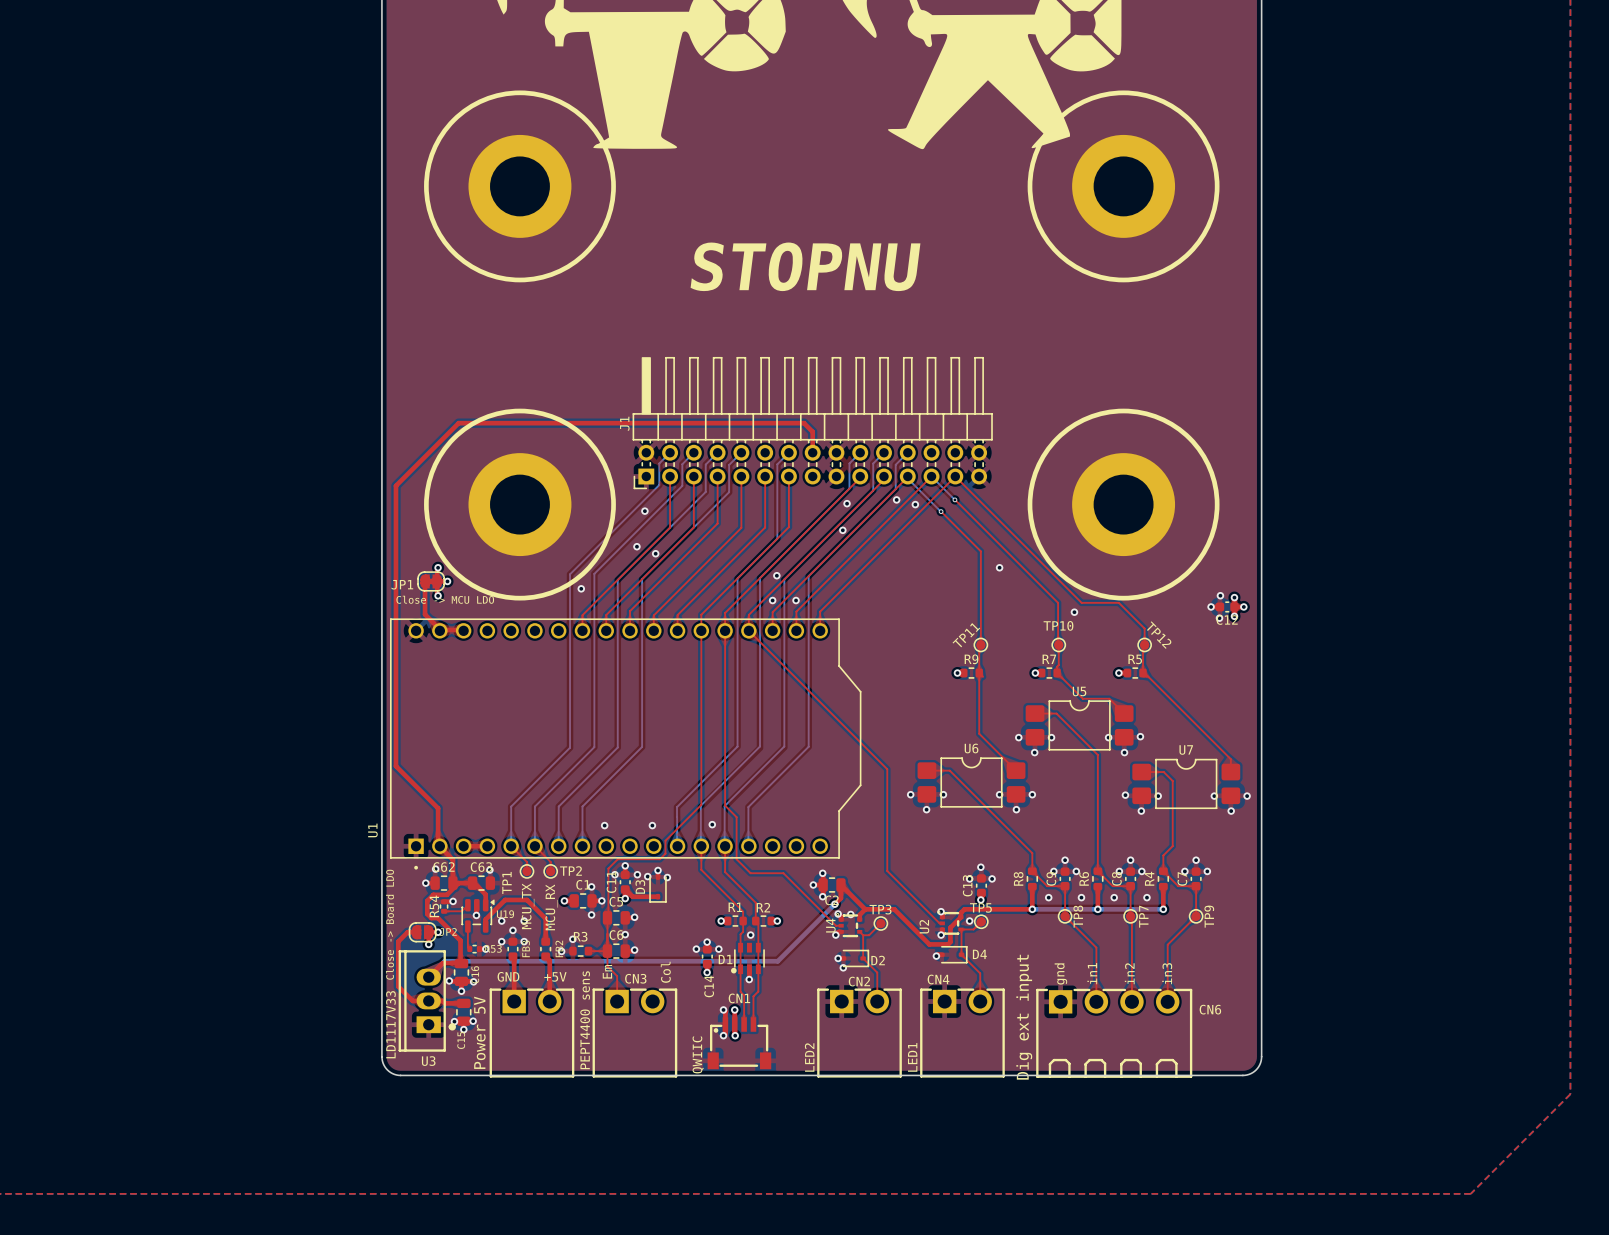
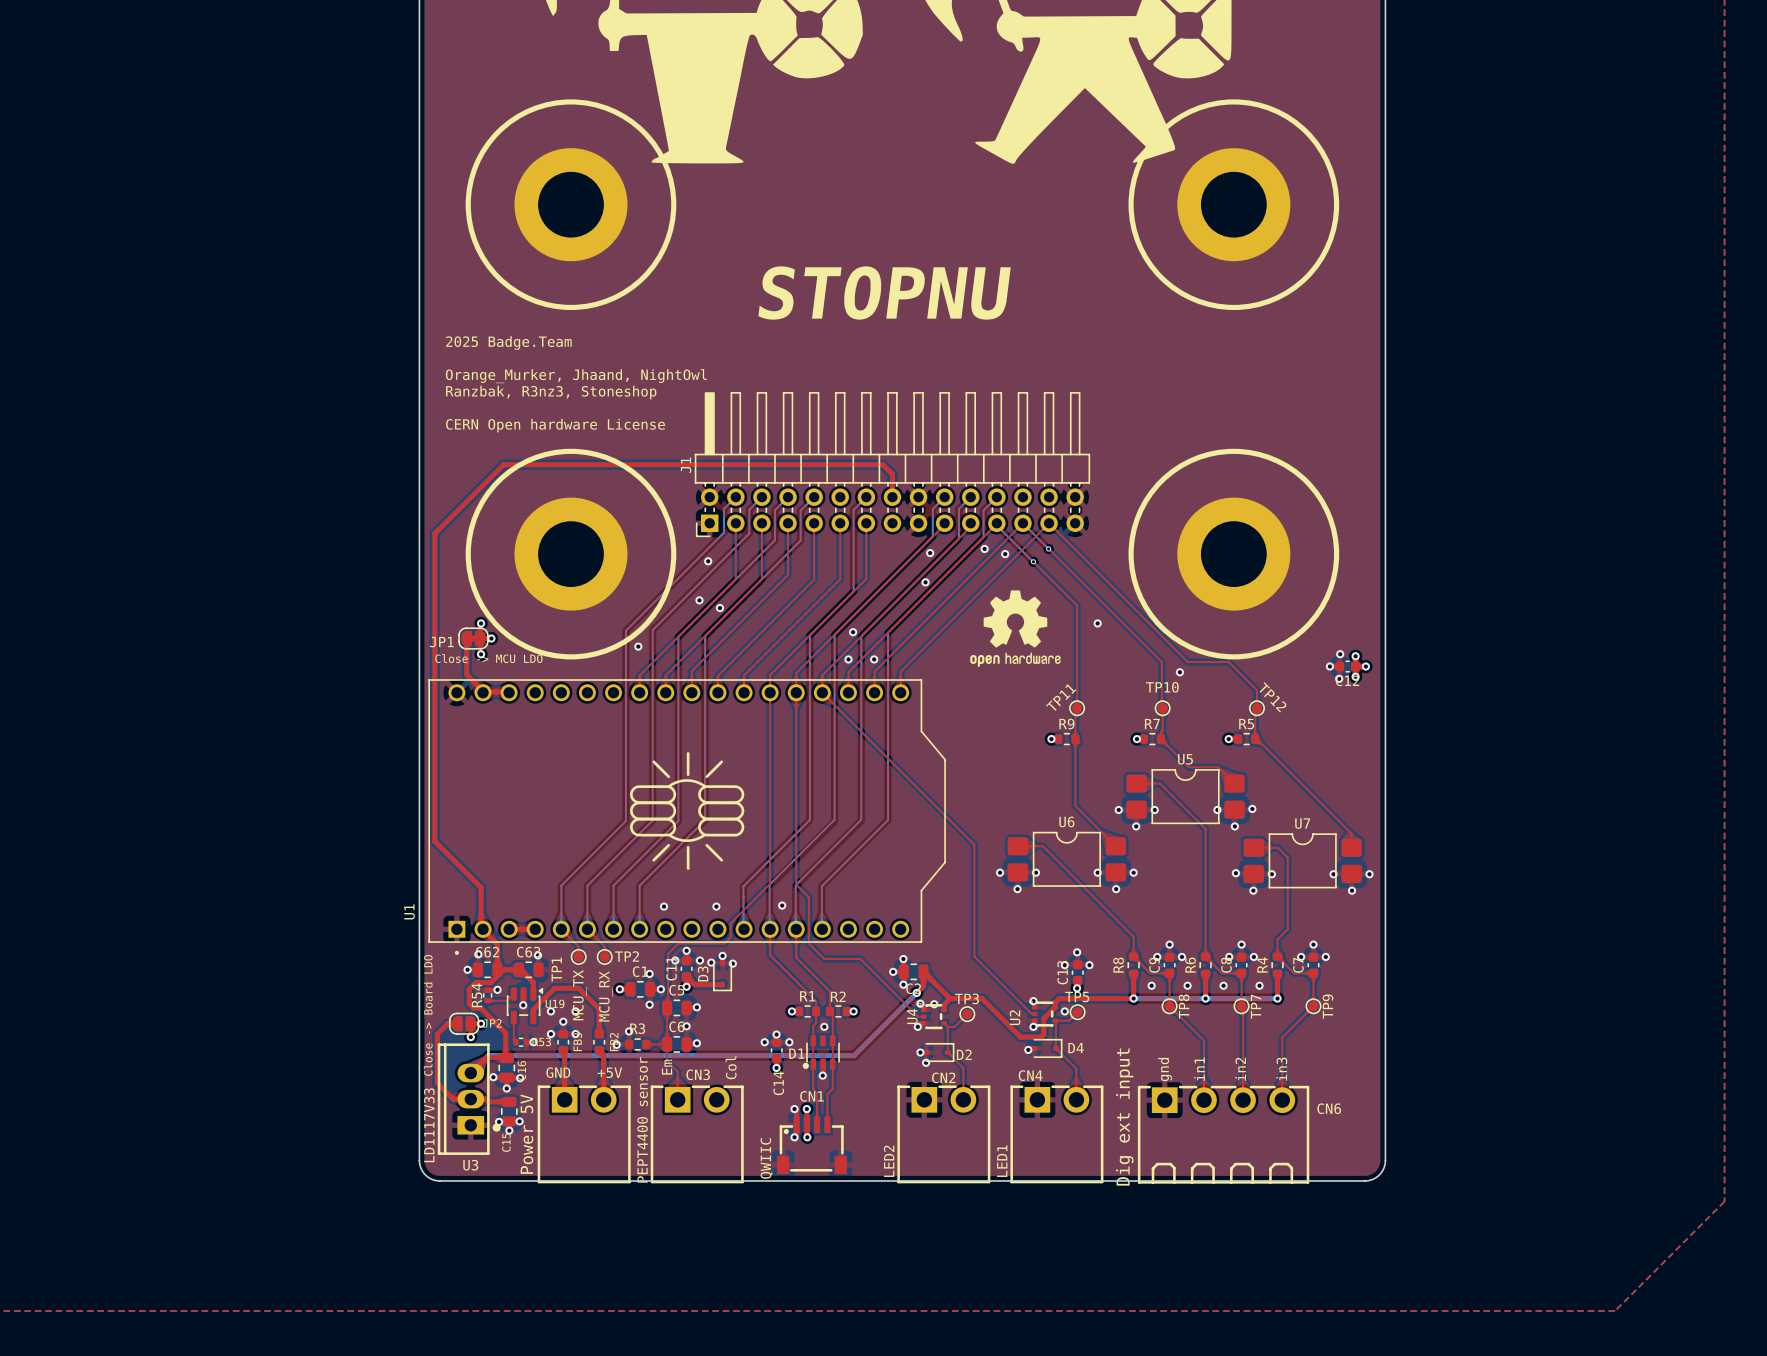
text: none -> 2025 Badge.Team (508, 342)
text: none -> Orange_Murker, Jhaand, NightOwl (576, 376)
text: none -> Ranzbak, R3nz3, Stoneshop (551, 392)
text: none -> CERN Open hardware License (555, 425)
drawing: none -> [970, 590, 1061, 668]
drawing: none -> [630, 752, 745, 870]
CN3 text: PEPT4400 sens (585, 1020) -> PEPT4400 sensor (642, 1119)

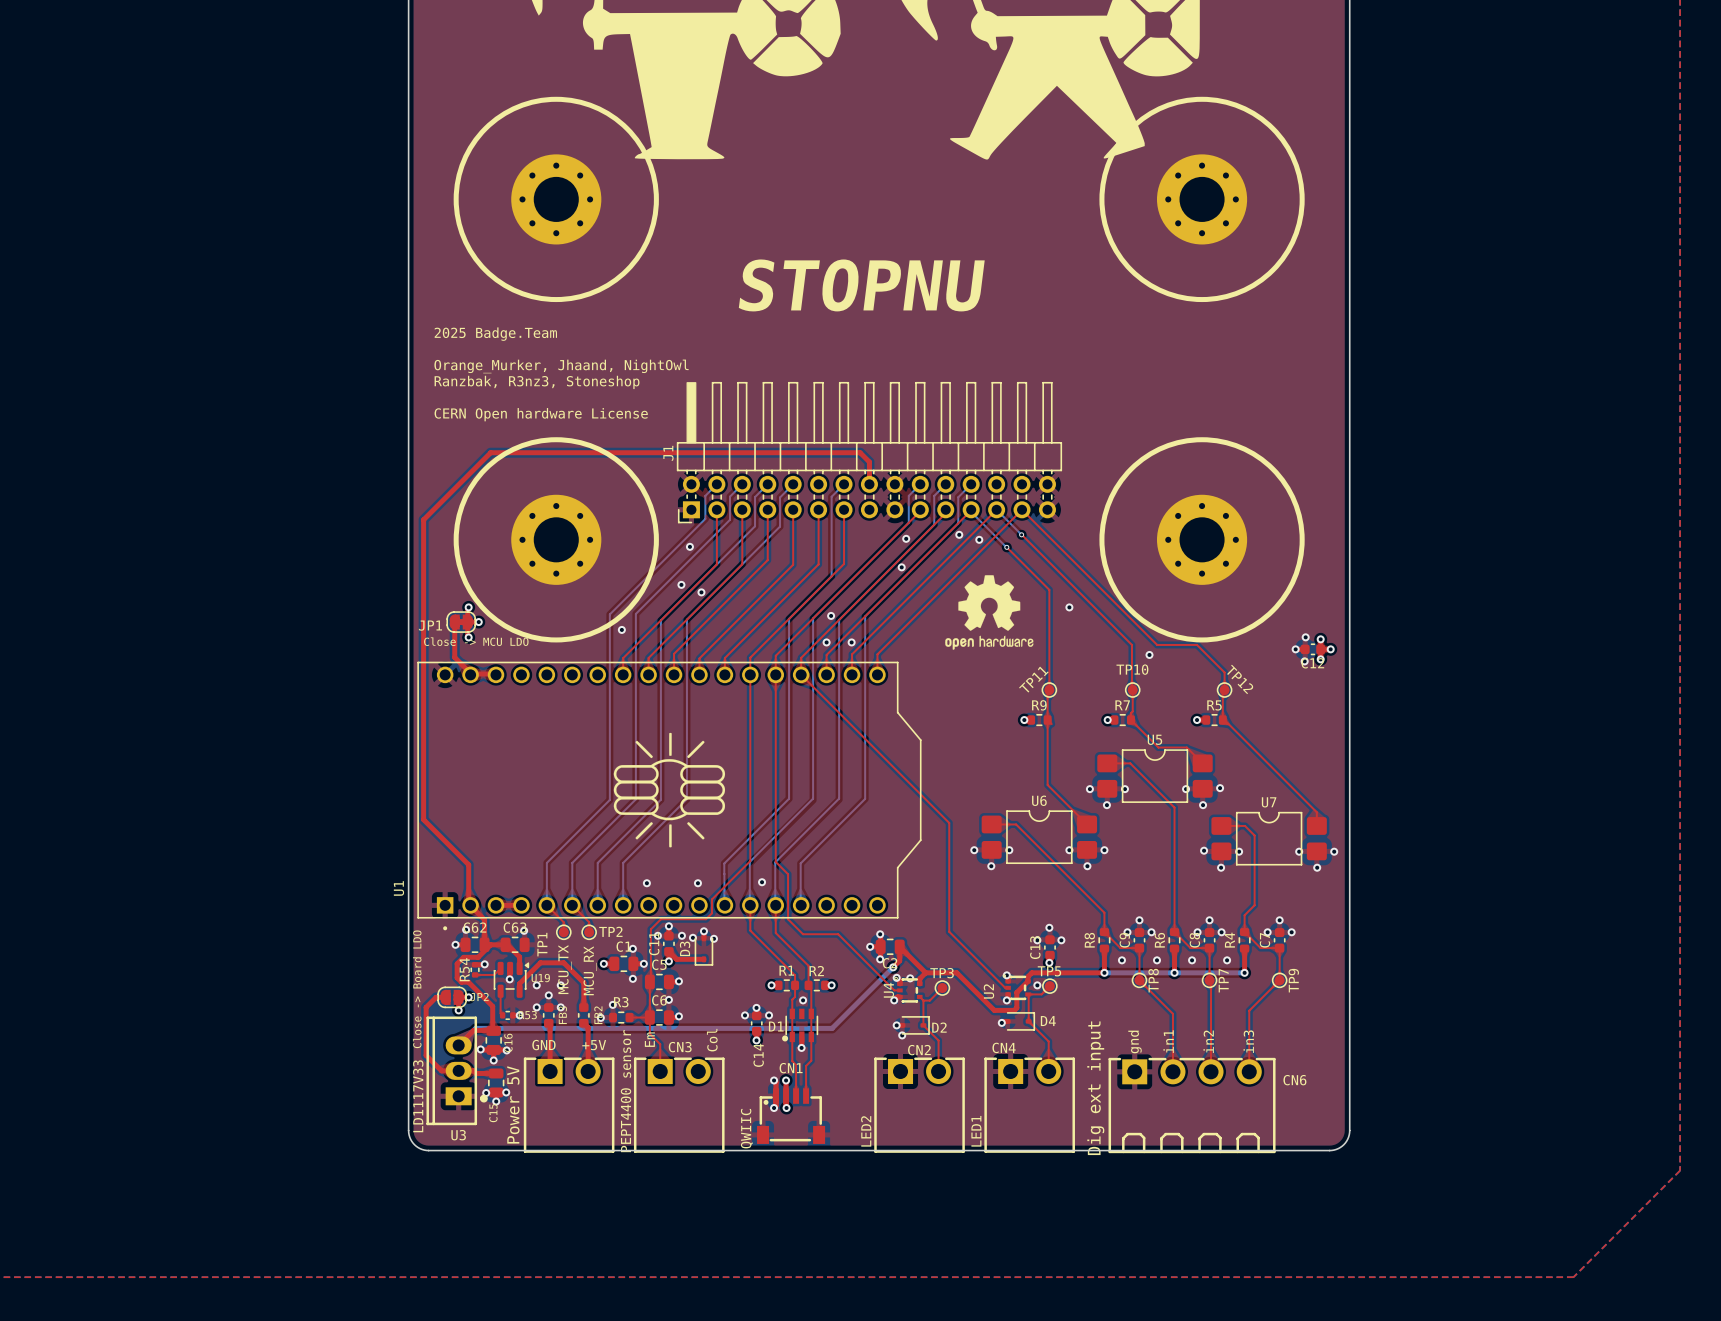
part footprint: [514, 148, 628, 262] -> [511, 154, 602, 245]
part footprint: [1177, 148, 1291, 262] -> [1157, 154, 1248, 245]
part footprint: [514, 497, 628, 611] -> [511, 494, 602, 585]
part footprint: [1177, 497, 1291, 611] -> [1157, 494, 1248, 585]

